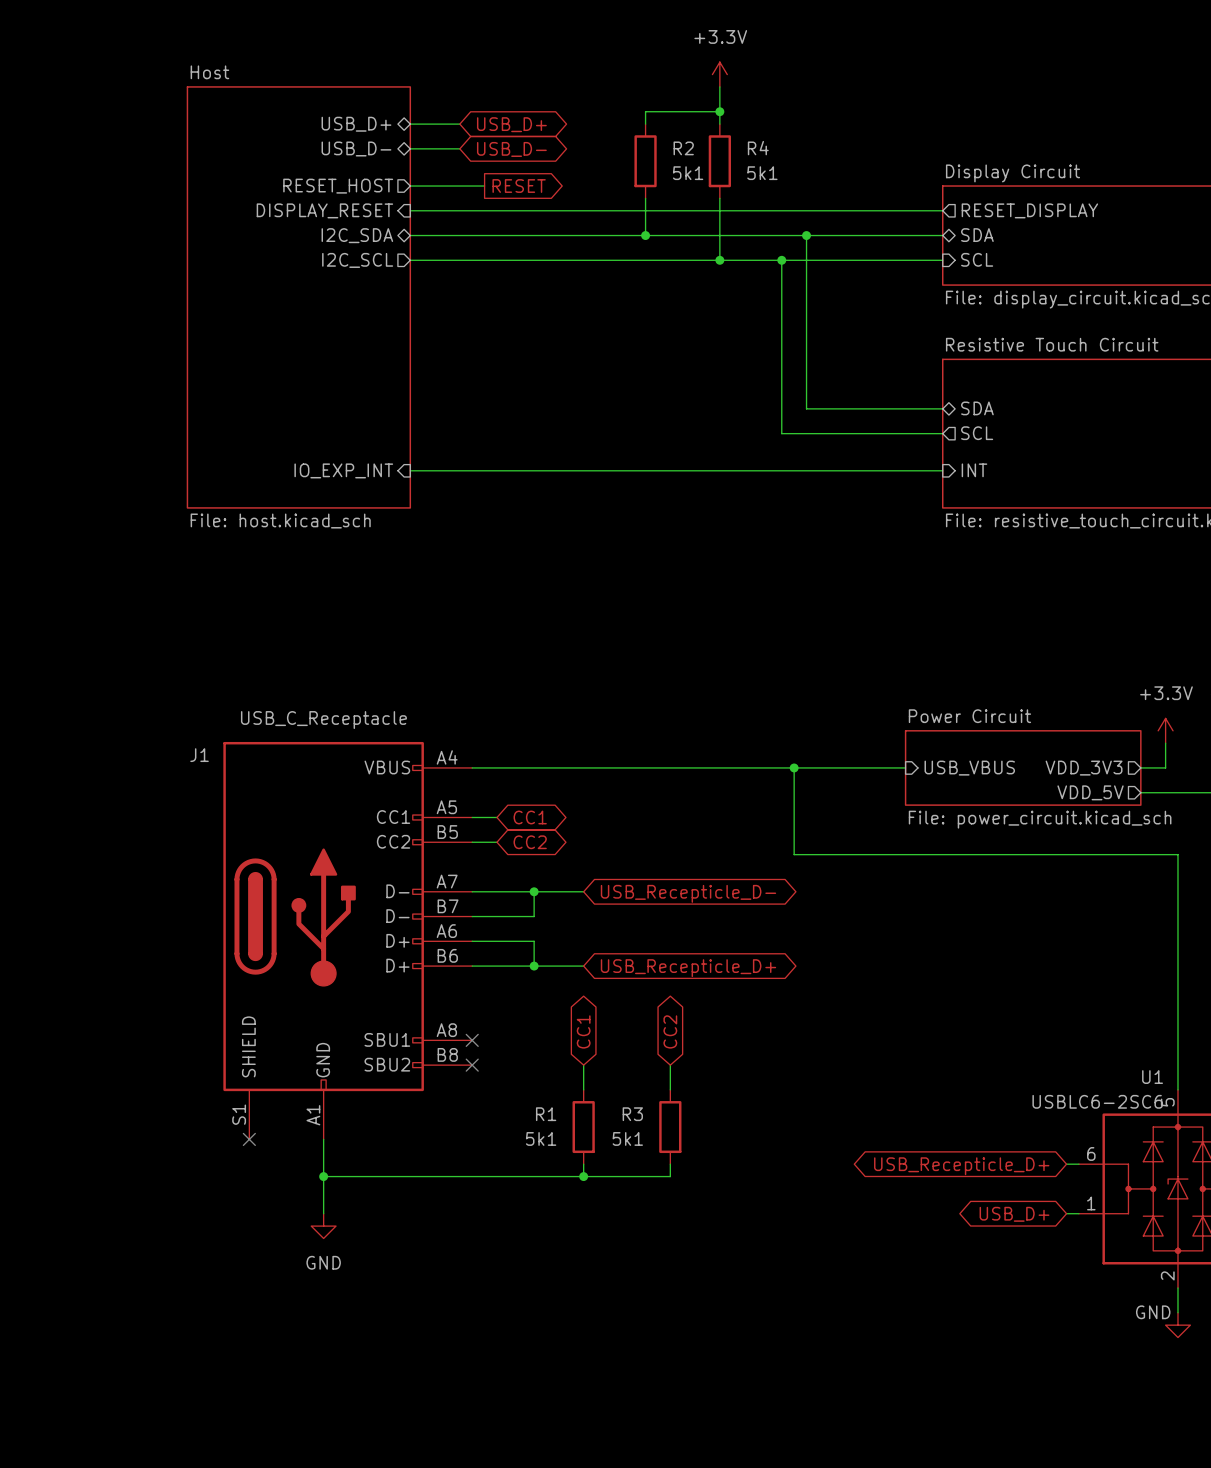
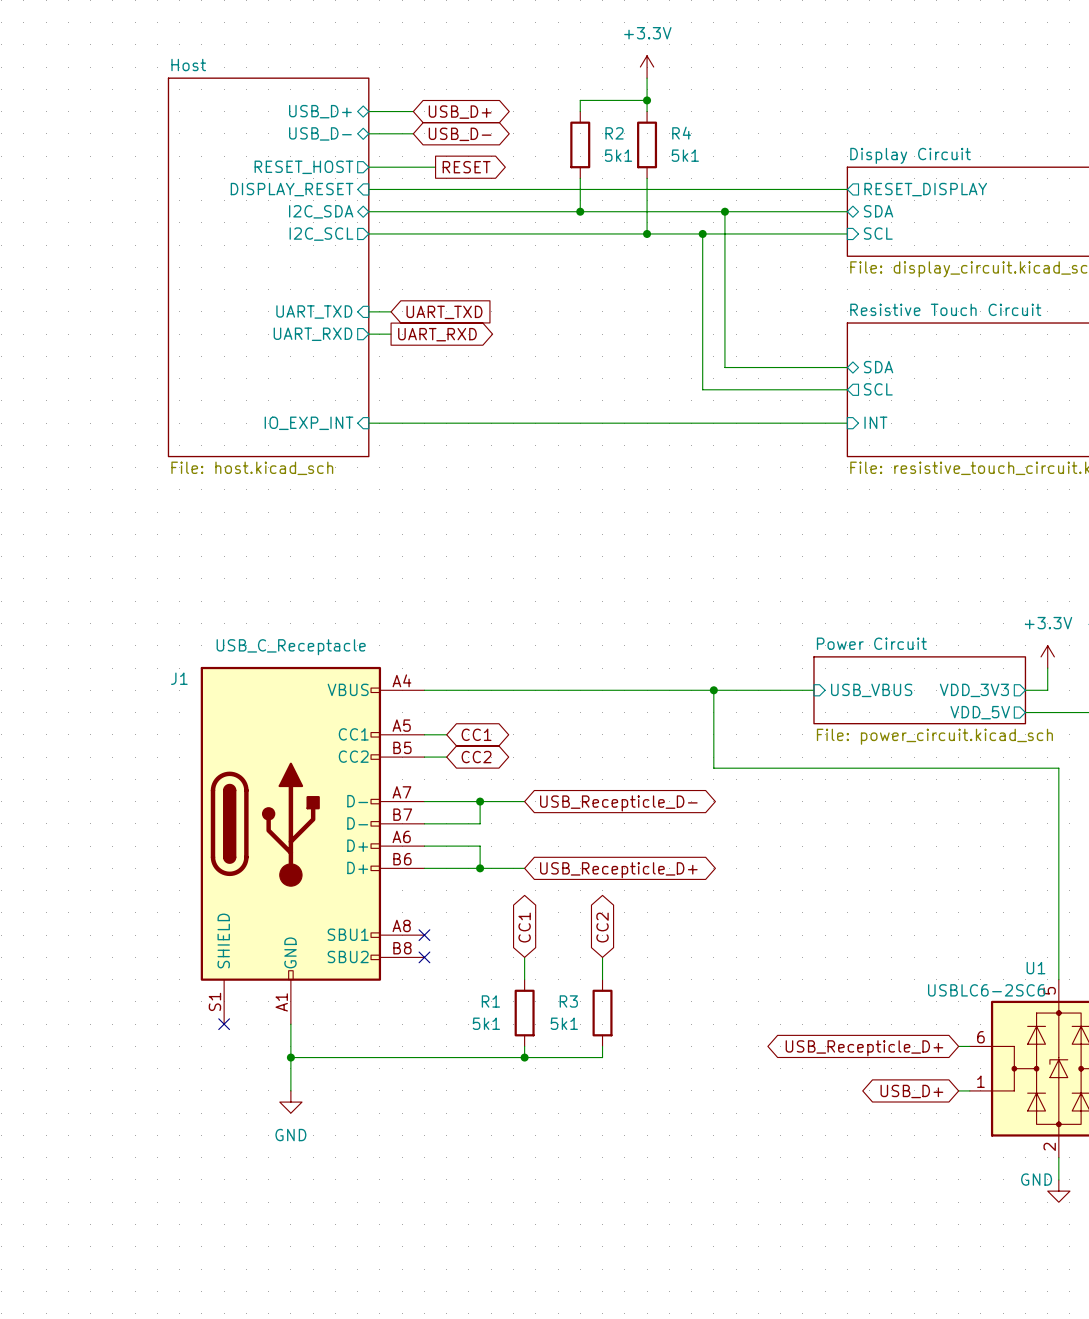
wire: none -> (368, 311) (391, 311)
sheet pin: none -> UART_TXD (314, 311)
global label: none -> UART_TXD (444, 312)
sheet pin: none -> UART_RXD (312, 334)
wire: none -> (368, 334) (391, 334)
global label: none -> UART_RXD (437, 334)

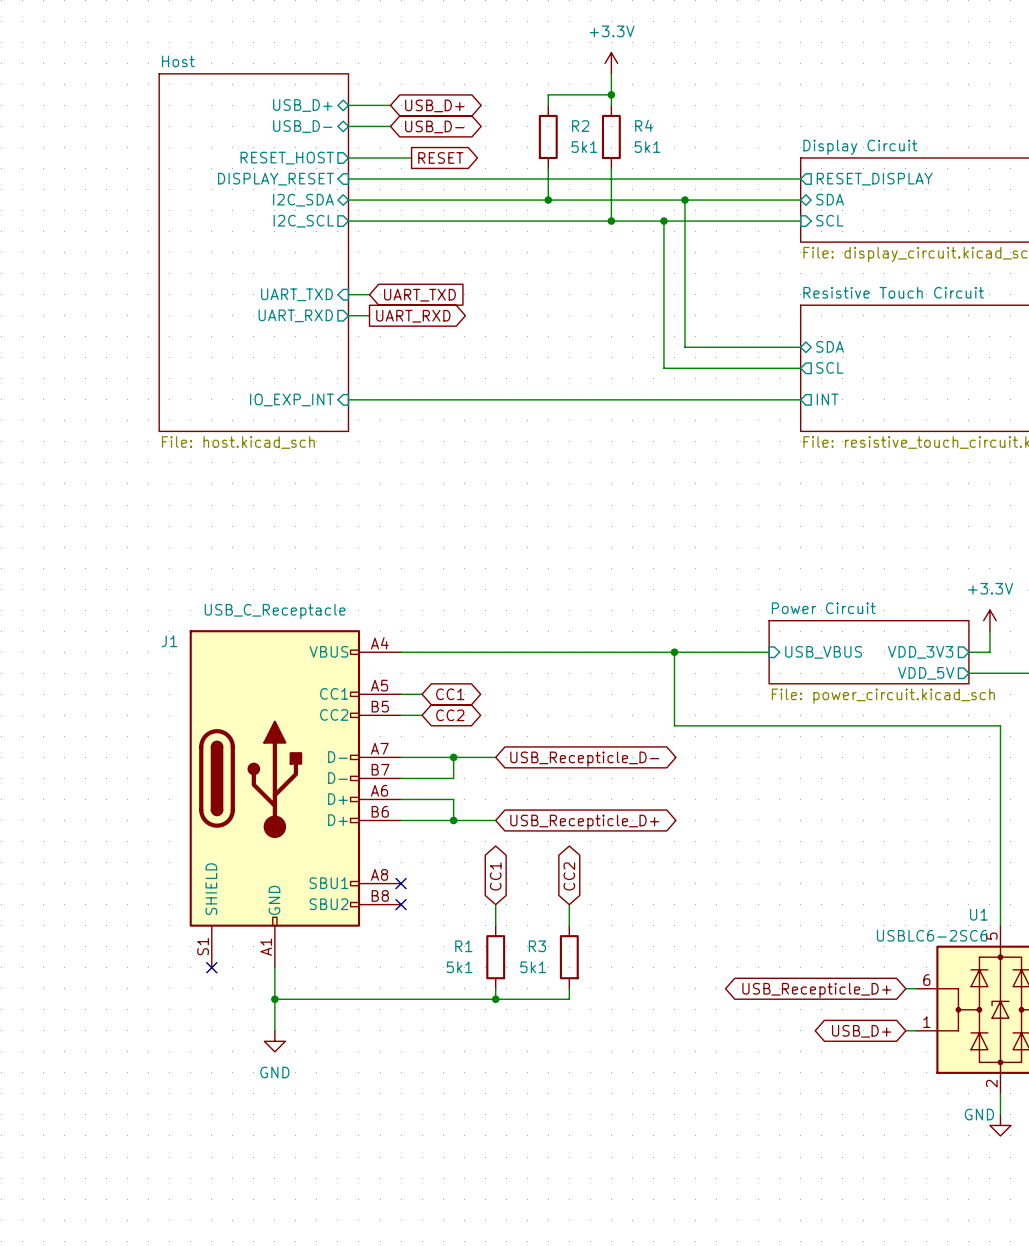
sheet pin shape: input (875, 422) -> output (827, 399)

